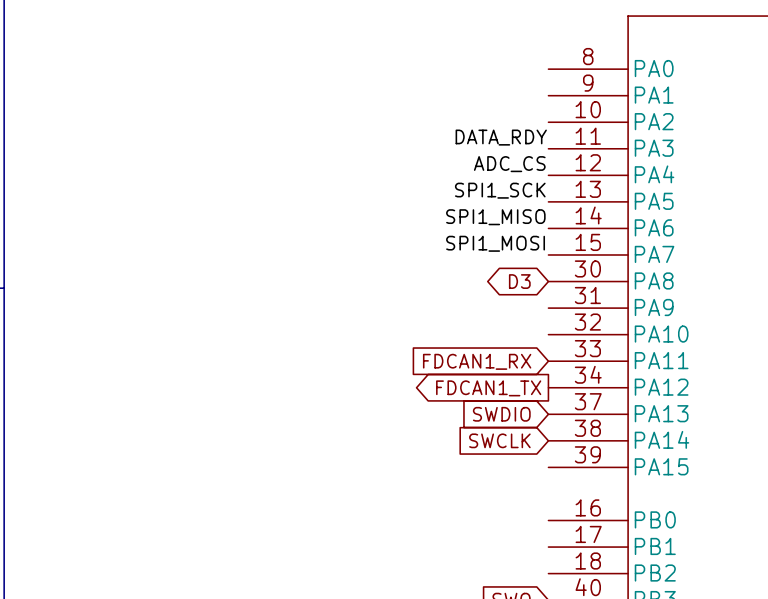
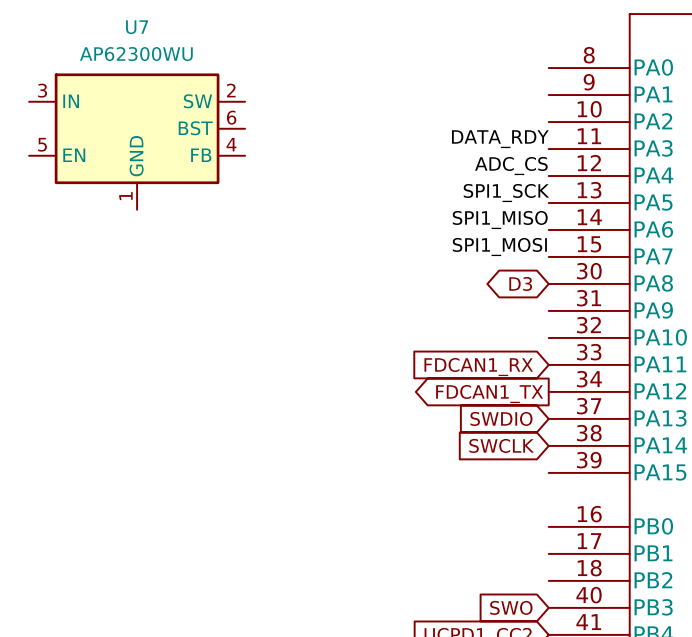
U7: none -> AP62300WU (137, 141)

